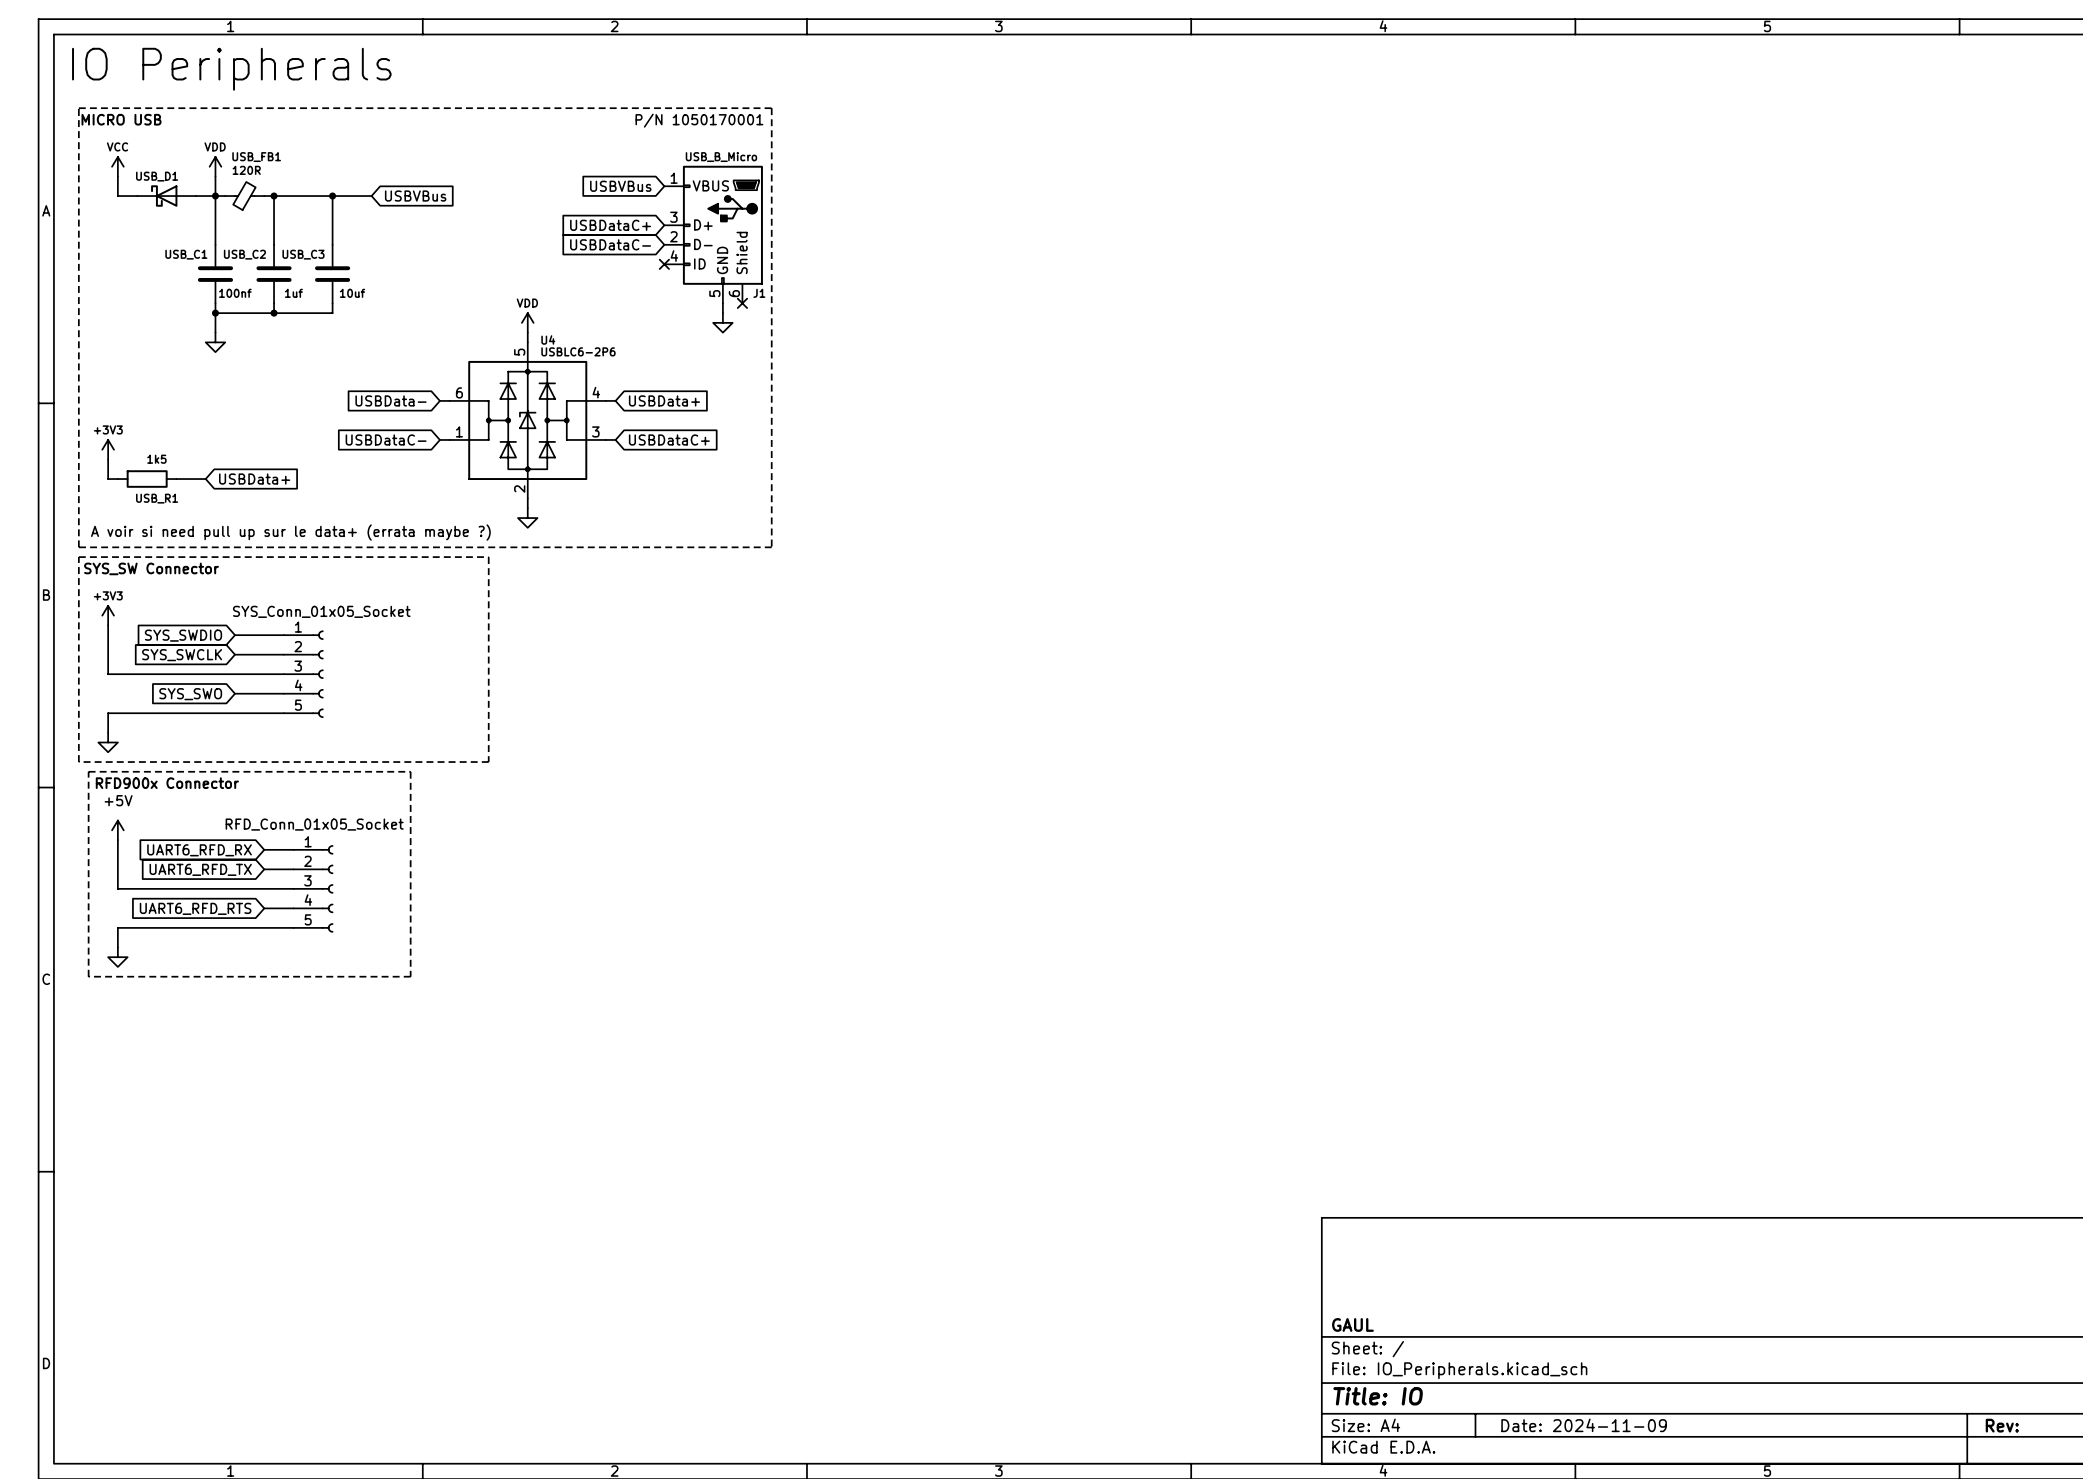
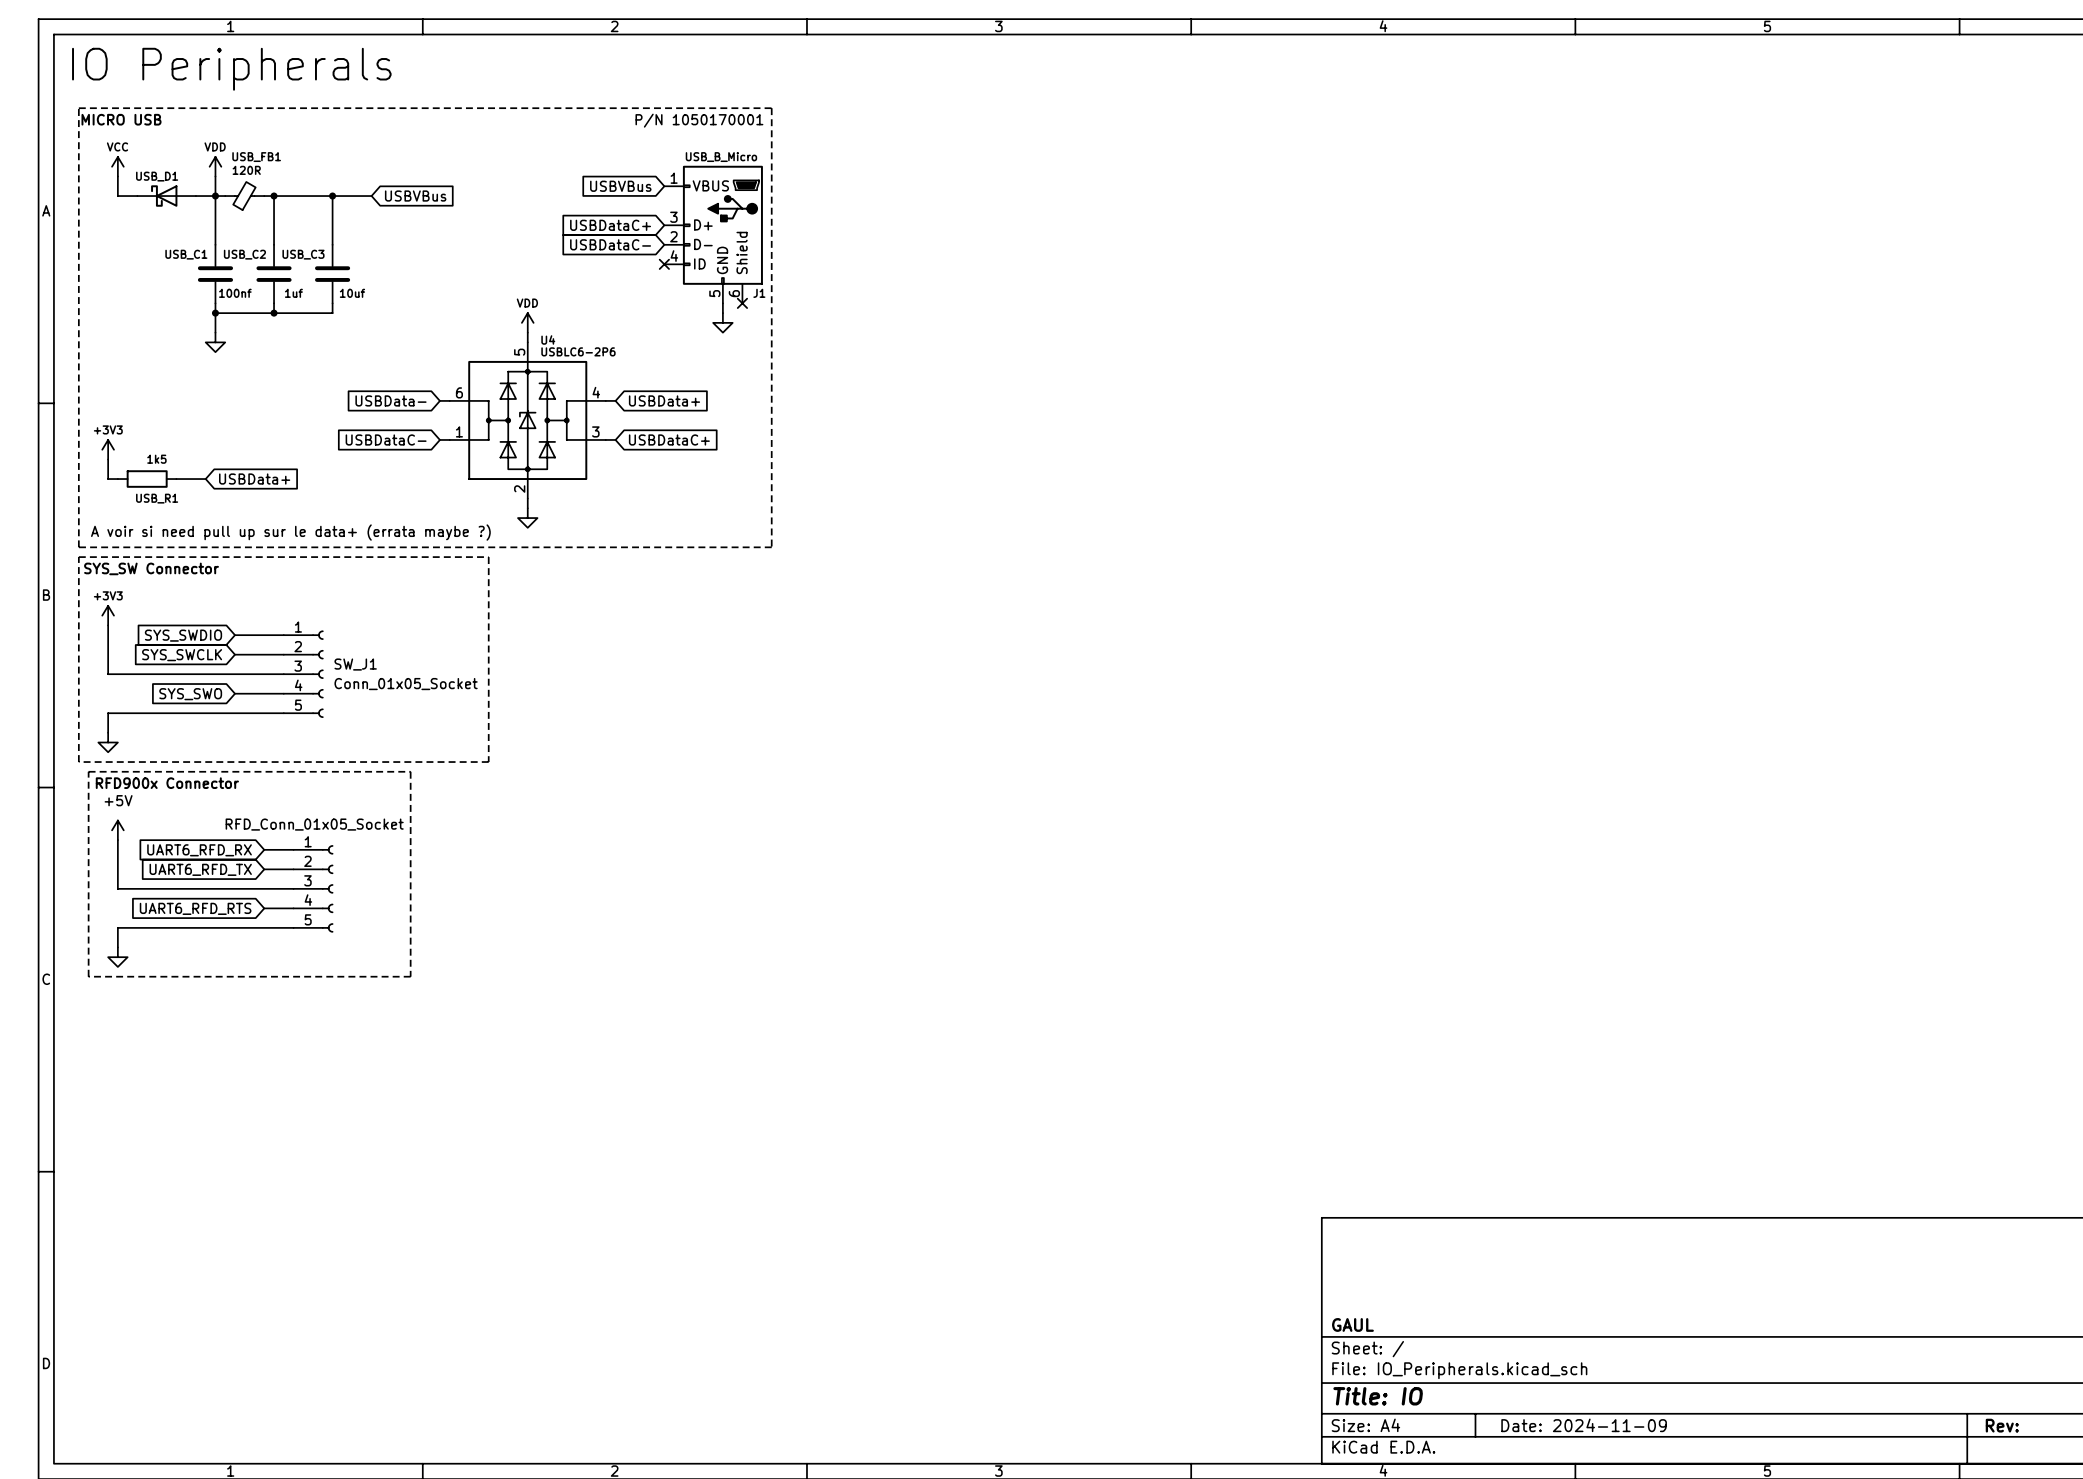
SW_J1 value: SYS_Conn_01x05_Socket (321, 611) -> Conn_01x05_Socket (406, 684)
SW_J1 name: none -> SW_J1 (355, 664)

